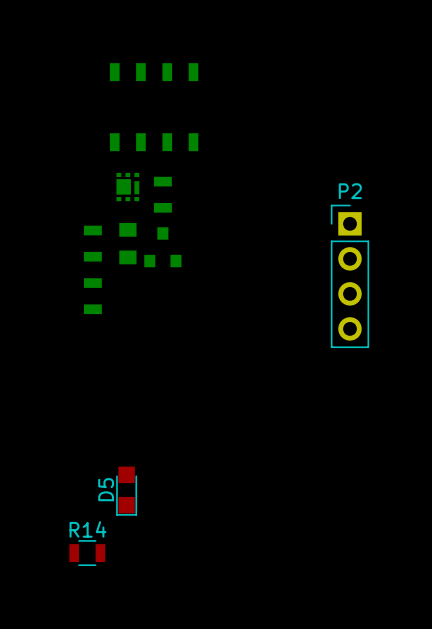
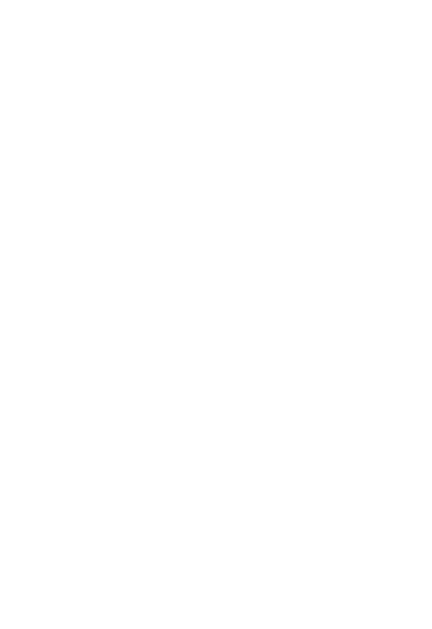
part: (127, 72) -> none
part: (180, 72) -> none
part: (127, 142) -> none
part: (180, 142) -> none
part: (127, 187) -> none
part: (162, 194) -> none
part: (92, 243) -> none
part: (127, 243) -> none
part: (162, 247) -> none
P2: (349, 276) -> none
part: (92, 296) -> none
D5: (126, 491) -> none
R14: (87, 553) -> none

